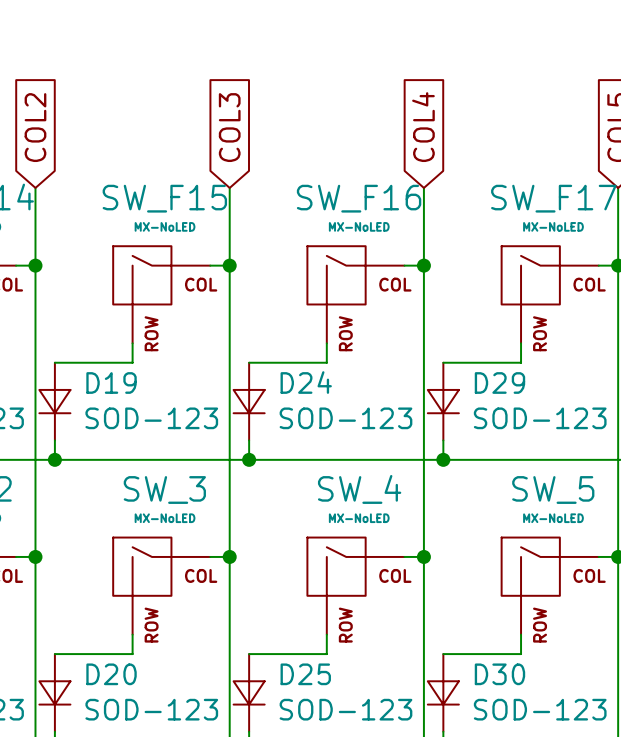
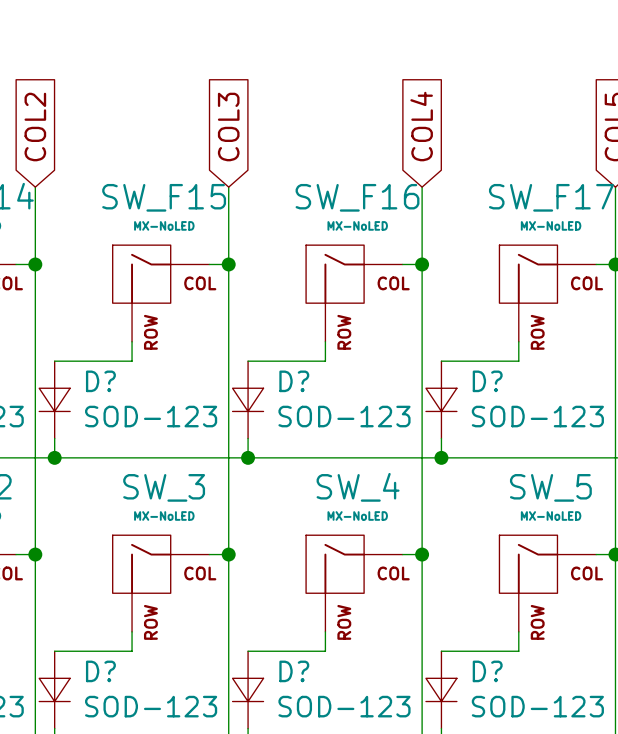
D19 name: D19 (111, 382) -> D? (100, 381)
D24 name: D24 (306, 382) -> D? (294, 381)
D29 name: D29 (499, 382) -> D? (487, 381)
D20 name: D20 (111, 674) -> D? (100, 671)
D25 name: D25 (305, 674) -> D? (294, 671)
D30 name: D30 (499, 674) -> D? (487, 671)

